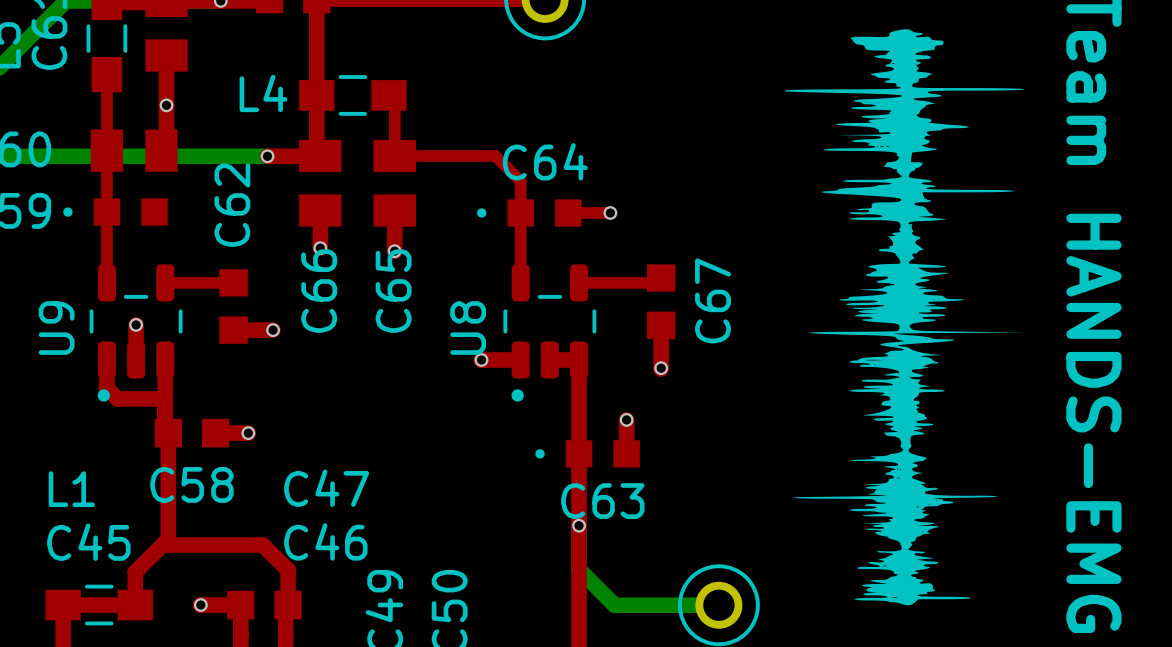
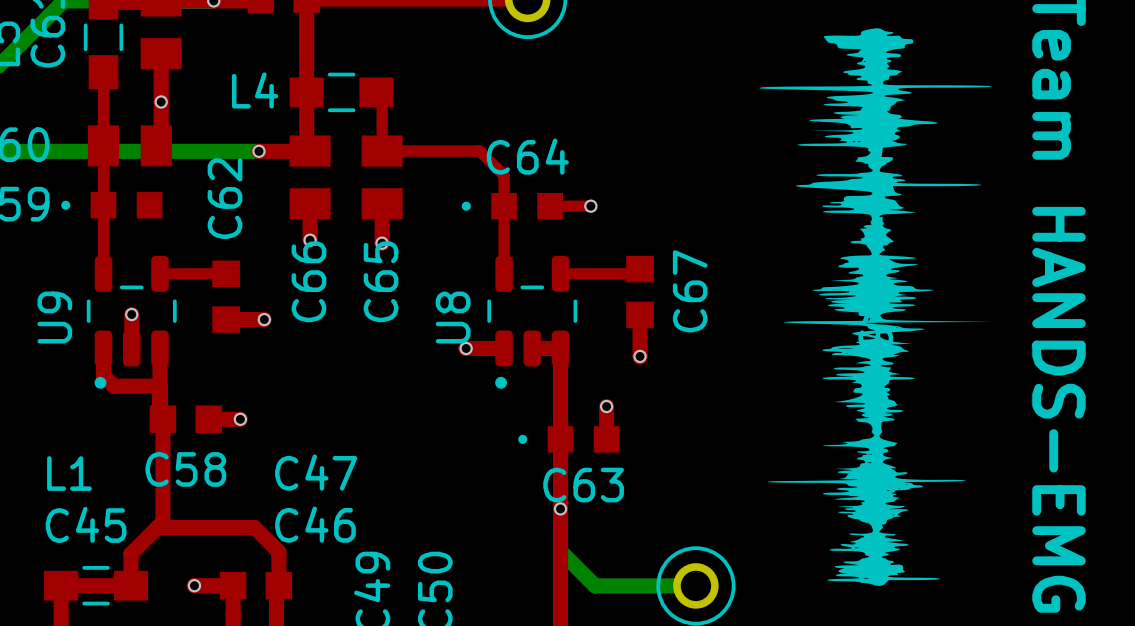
drawing: [784, 29, 1026, 606] -> none
part: none -> (876, 307)

